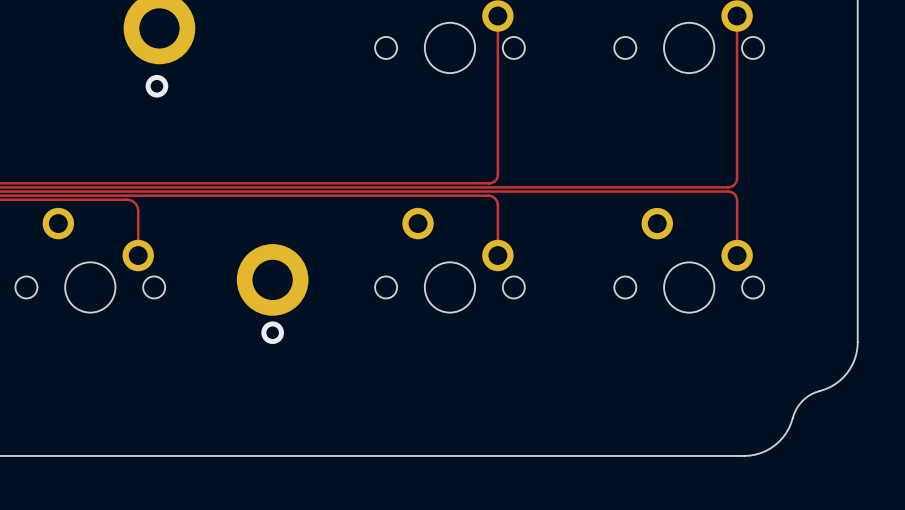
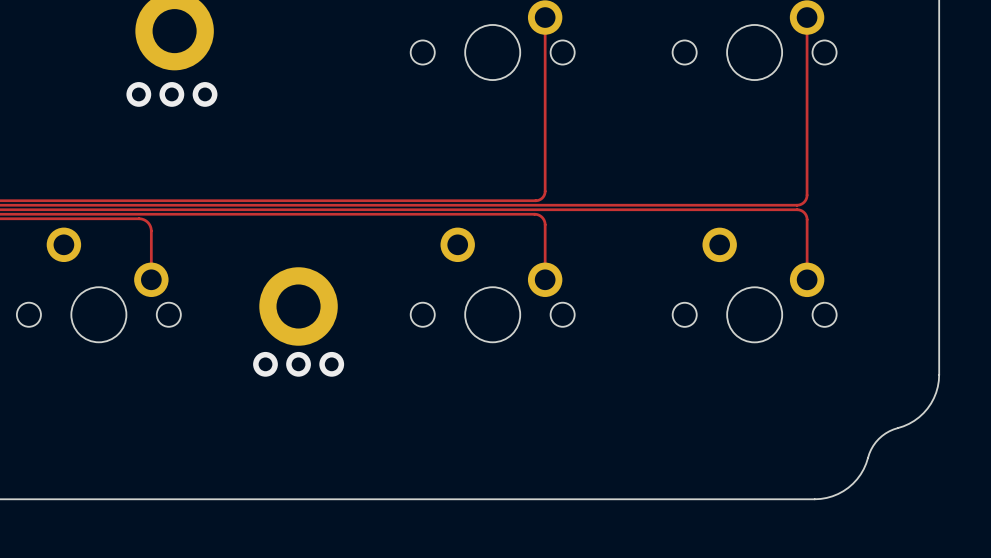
via: none -> (138, 94)
via: none -> (205, 94)
via: none -> (265, 364)
via: none -> (331, 364)

